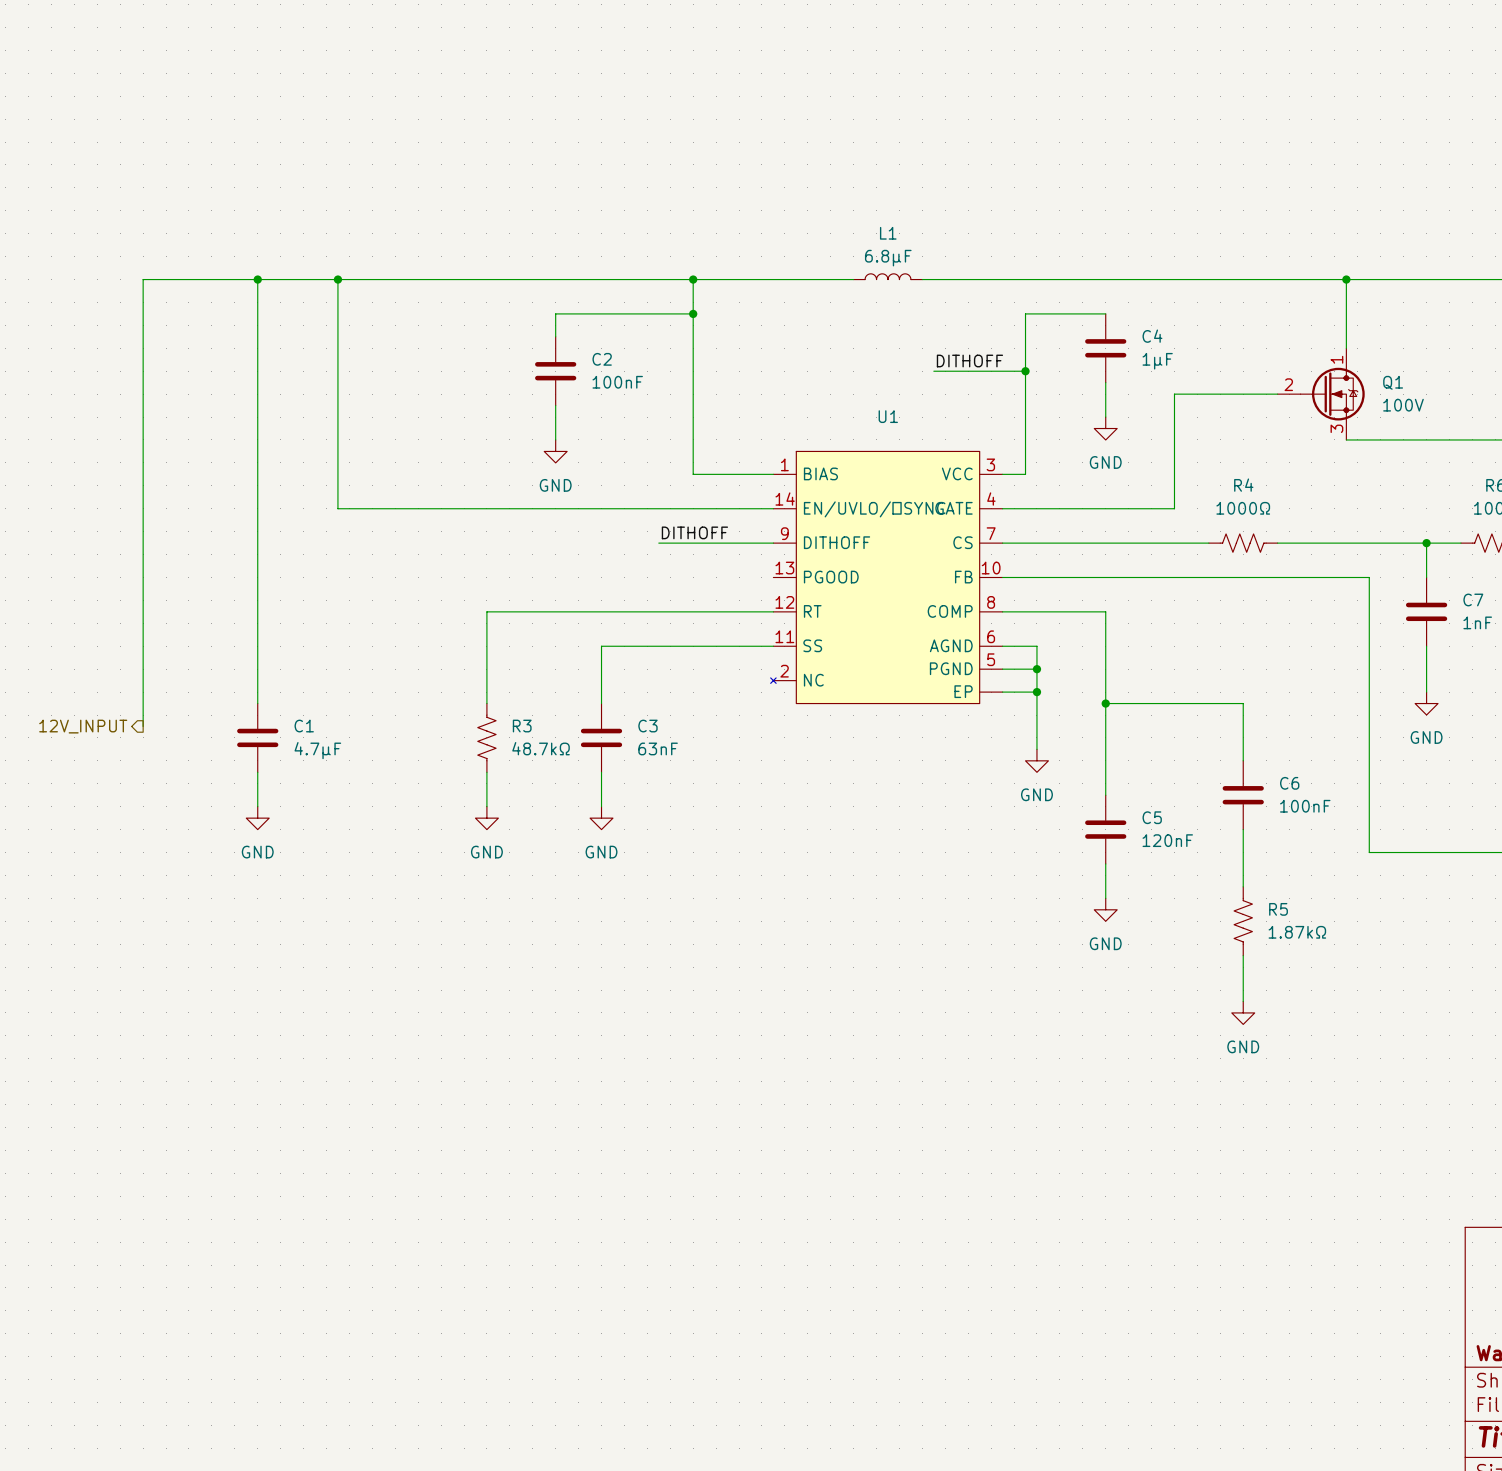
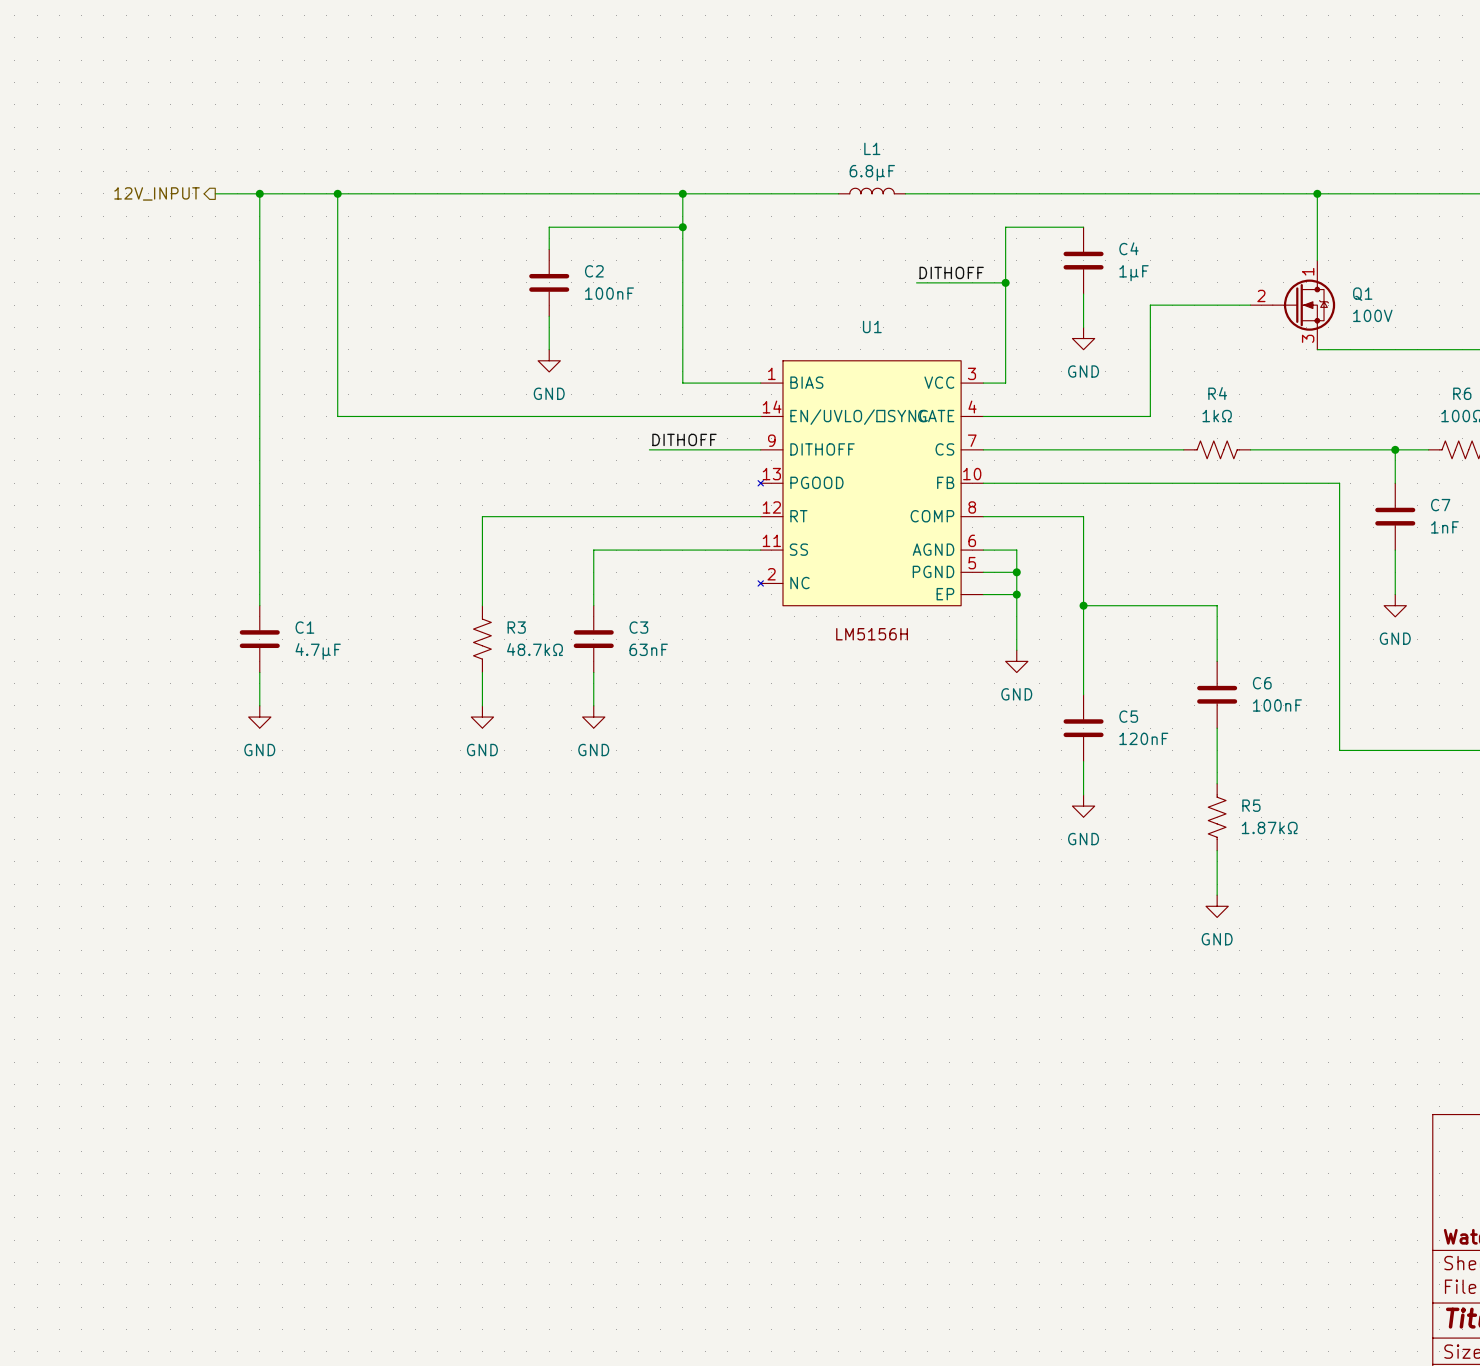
hierarchical label: none -> 12V_INPUT (157, 193)
wire: (211, 279) (143, 279) (143, 726) -> none
U1 symbol: [770, 451, 1003, 704] -> [758, 360, 984, 606]
R4 value: 1000Ω (1243, 508) -> 1kΩ (1217, 416)
hierarchical label: 12V_INPUT (83, 726) -> none

